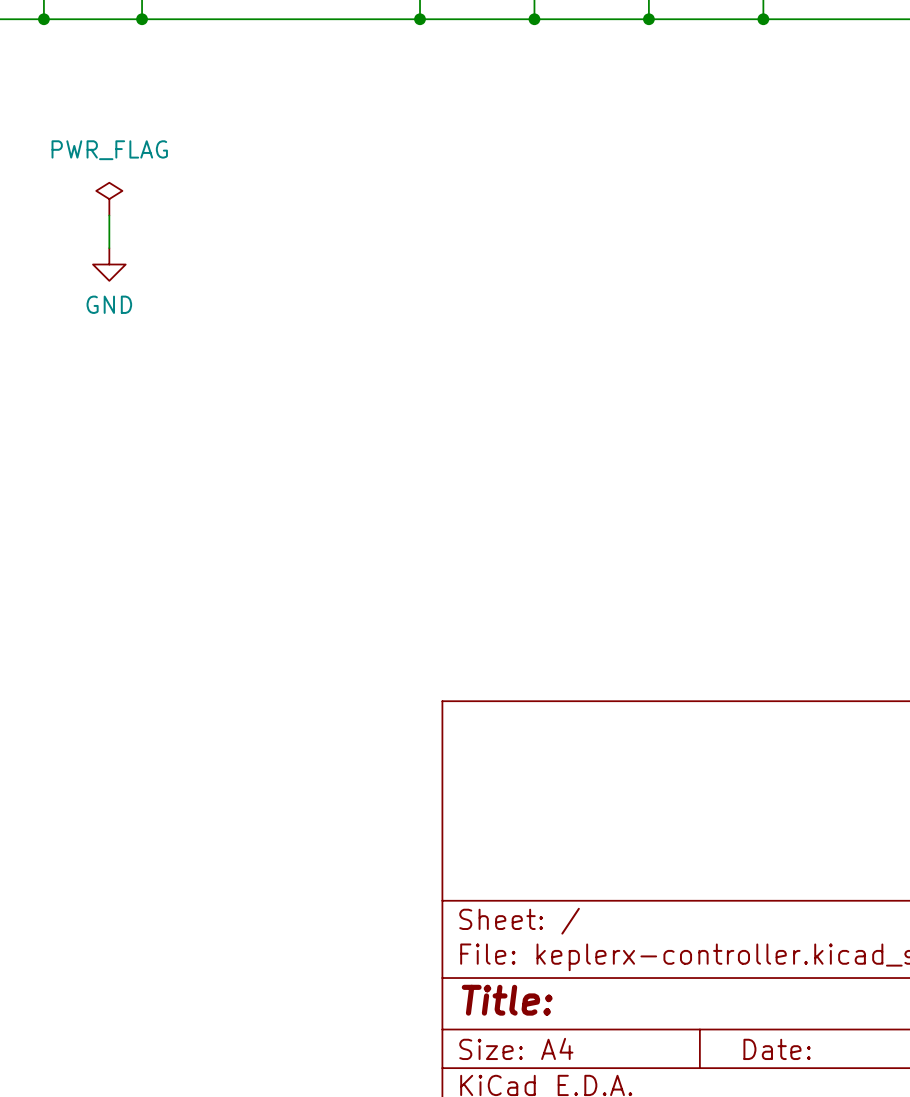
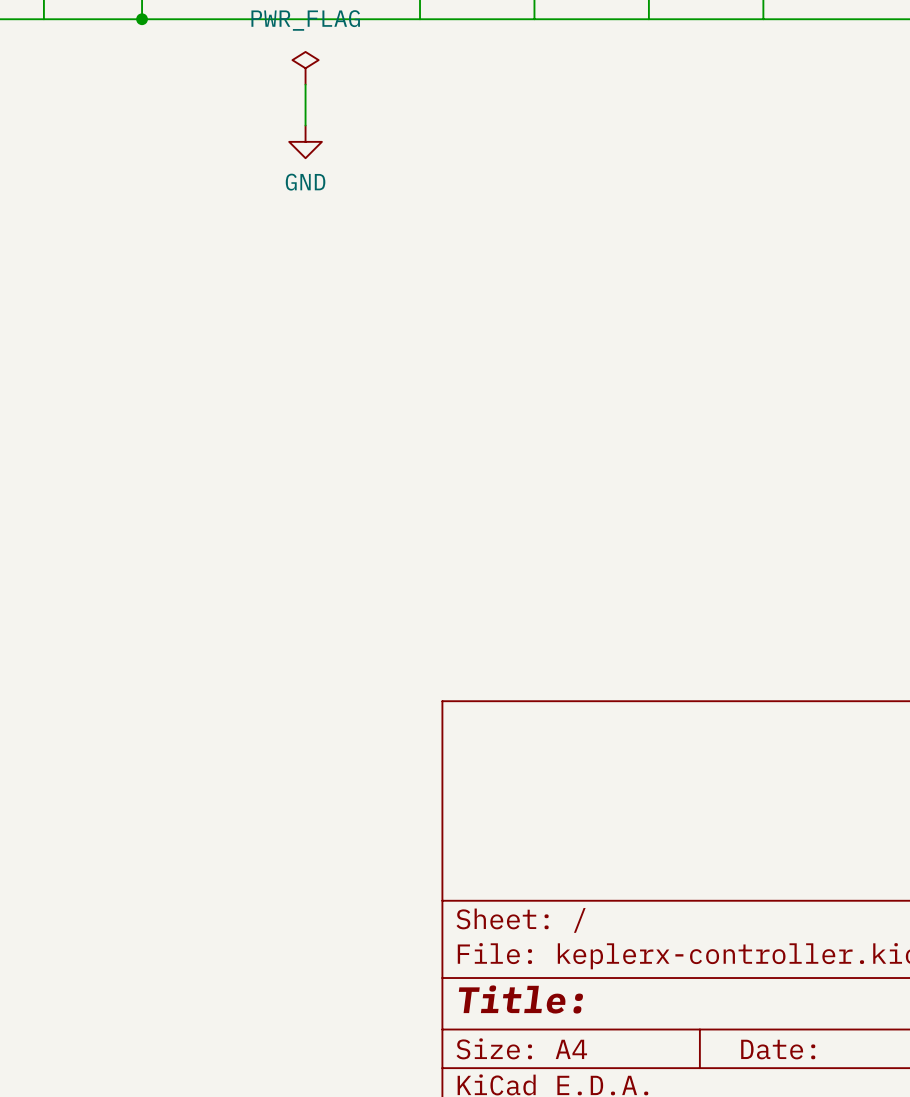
junction: (43, 19) -> none
junction: (420, 19) -> none
junction: (534, 19) -> none
junction: (648, 19) -> none
junction: (763, 19) -> none
wire: none -> (305, 84) (305, 125)
power symbol: none -> GND (305, 141)
power symbol position: PWR_FLAG (109, 199) -> PWR_FLAG (305, 68)
wire: (109, 215) (109, 248) -> none
power symbol: GND (109, 264) -> none

